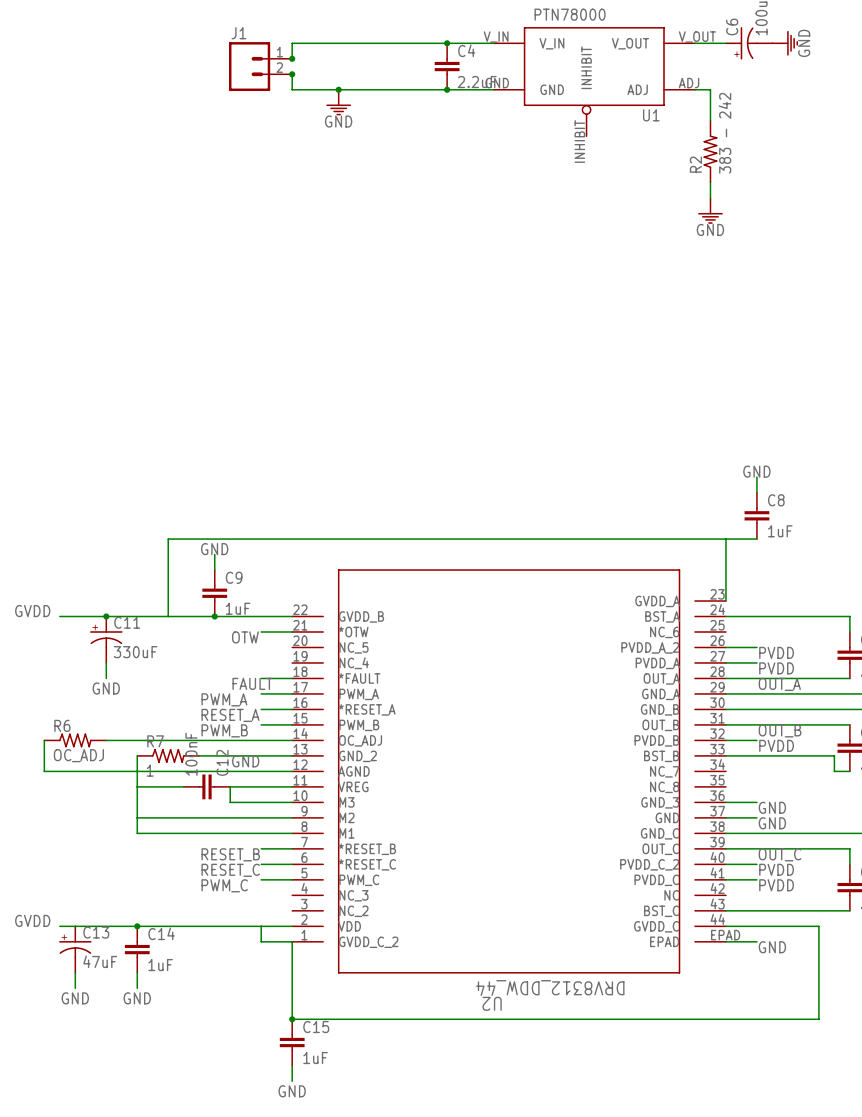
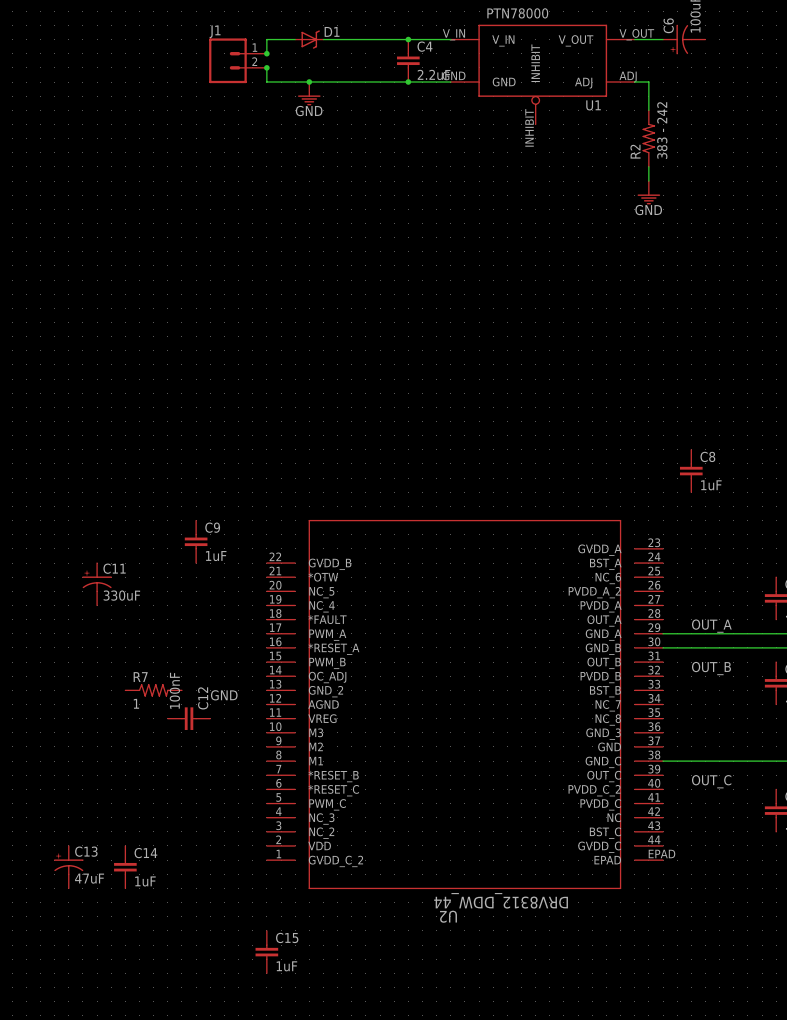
D1: none -> (309, 39)
power symbol: GND (785, 43) -> none
label: GND (756, 471) -> none
wire: (756, 477) (756, 492) -> none
wire: (725, 539) (725, 601) -> none
wire: (756, 539) (168, 539) (168, 616) -> none
label: GND (214, 549) -> none
wire: (214, 554) (214, 570) -> none
label: GVDD (32, 611) -> none
wire: (59, 616) (292, 616) -> none
junction: (106, 616) -> none
junction: (214, 616) -> none
wire: (725, 616) (849, 616) (849, 631) -> none
wire: (261, 631) (292, 631) -> none
label: OTW (245, 637) -> none
wire: (725, 647) (756, 647) -> none
label: PVDD (776, 652) -> none
wire: (106, 662) (106, 678) -> none
wire: (725, 662) (756, 662) -> none
label: PVDD (776, 668) -> none
wire: (261, 678) (292, 678) -> none
wire: (725, 678) (849, 678) -> none
label: FAULT (252, 683) -> none
label: GND (106, 688) -> none
wire: (261, 693) (292, 693) -> none
label: PWM_A (224, 699) -> none
wire: (261, 709) (292, 709) -> none
label: RESET_A (230, 715) -> none
wire: (261, 724) (292, 724) -> none
wire: (725, 724) (849, 724) -> none
label: PWM_B (224, 730) -> none
wire: (44, 740) (44, 771) (292, 771) -> none
R6: OC_ADJ (75, 740) -> none
wire: (106, 740) (292, 740) -> none
wire: (725, 740) (756, 740) -> none
label: PVDD (776, 745) -> none
wire: (137, 755) (137, 833) (292, 833) -> none
wire: (199, 755) (292, 755) -> none
wire: (725, 755) (834, 755) (834, 771) (849, 771) -> none
wire: (137, 786) (183, 786) -> none
wire: (292, 786) (230, 786) (230, 802) (292, 802) -> none
wire: (725, 802) (756, 802) -> none
label: GND (772, 807) -> none
wire: (137, 817) (292, 817) -> none
wire: (725, 817) (756, 817) -> none
label: GND (772, 823) -> none
wire: (261, 848) (292, 848) -> none
wire: (725, 848) (849, 848) (849, 864) -> none
label: RESET_B (230, 854) -> none
wire: (261, 864) (292, 864) -> none
wire: (725, 864) (756, 864) -> none
label: PVDD (776, 869) -> none
label: RESET_C (230, 870) -> none
wire: (261, 879) (292, 879) -> none
wire: (725, 879) (756, 879) -> none
label: PWM_C (224, 885) -> none
label: PVDD (776, 885) -> none
wire: (725, 910) (849, 910) -> none
label: GVDD (32, 920) -> none
wire: (59, 926) (292, 926) -> none
junction: (137, 926) -> none
wire: (261, 926) (261, 941) (292, 941) (292, 1019) (818, 1019) (818, 926) (725, 926) -> none
wire: (725, 941) (756, 941) -> none
label: GND (772, 947) -> none
wire: (75, 972) (75, 988) -> none
wire: (137, 972) (137, 988) -> none
label: GND (75, 998) -> none
label: GND (137, 998) -> none
junction: (292, 1019) -> none
wire: (292, 1065) (292, 1081) -> none
label: GND (292, 1091) -> none

